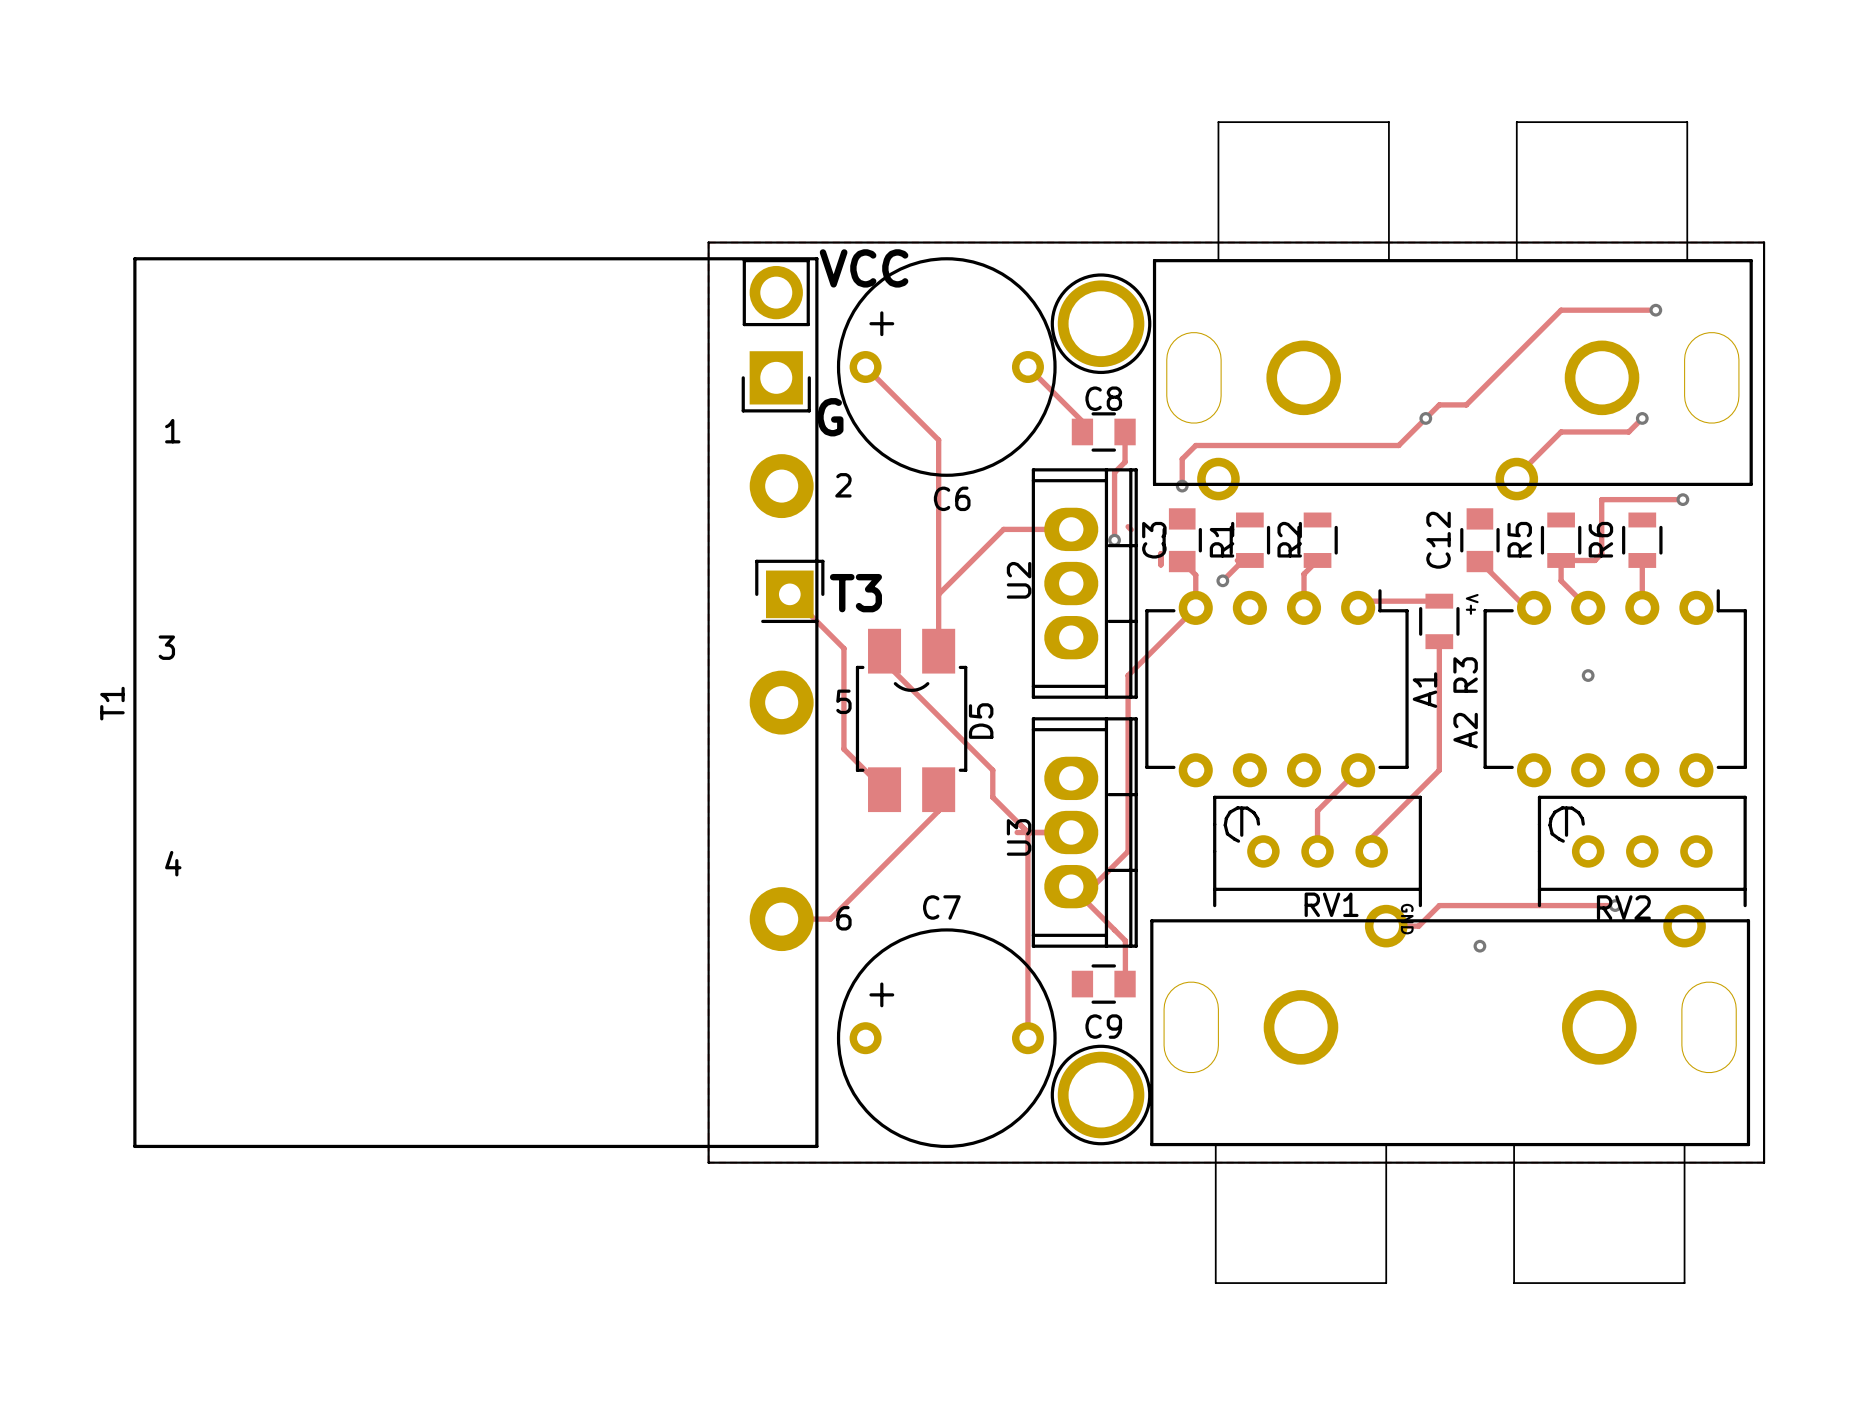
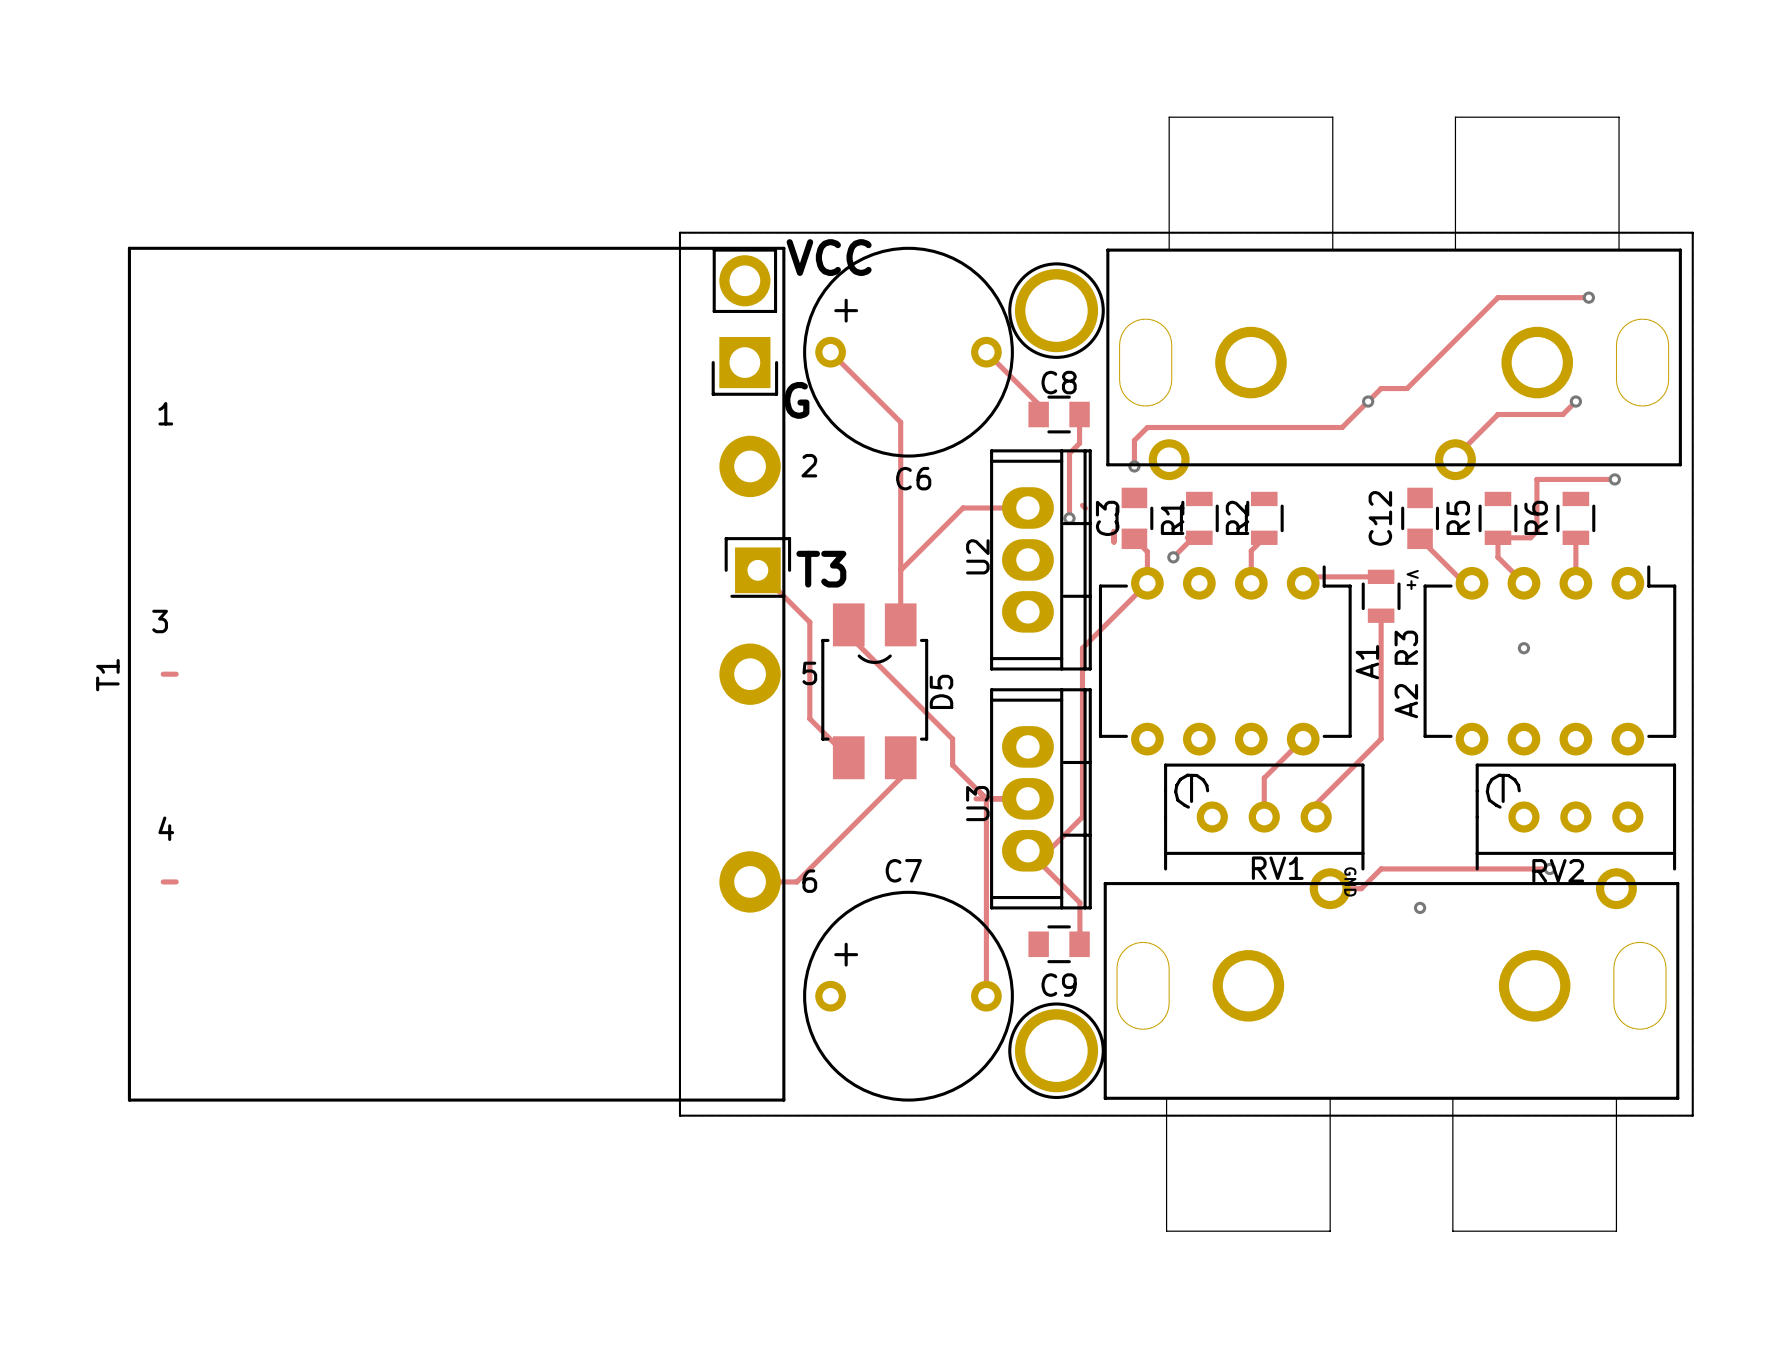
track: none -> (163, 674) (176, 674)
track: none -> (163, 881) (176, 881)

